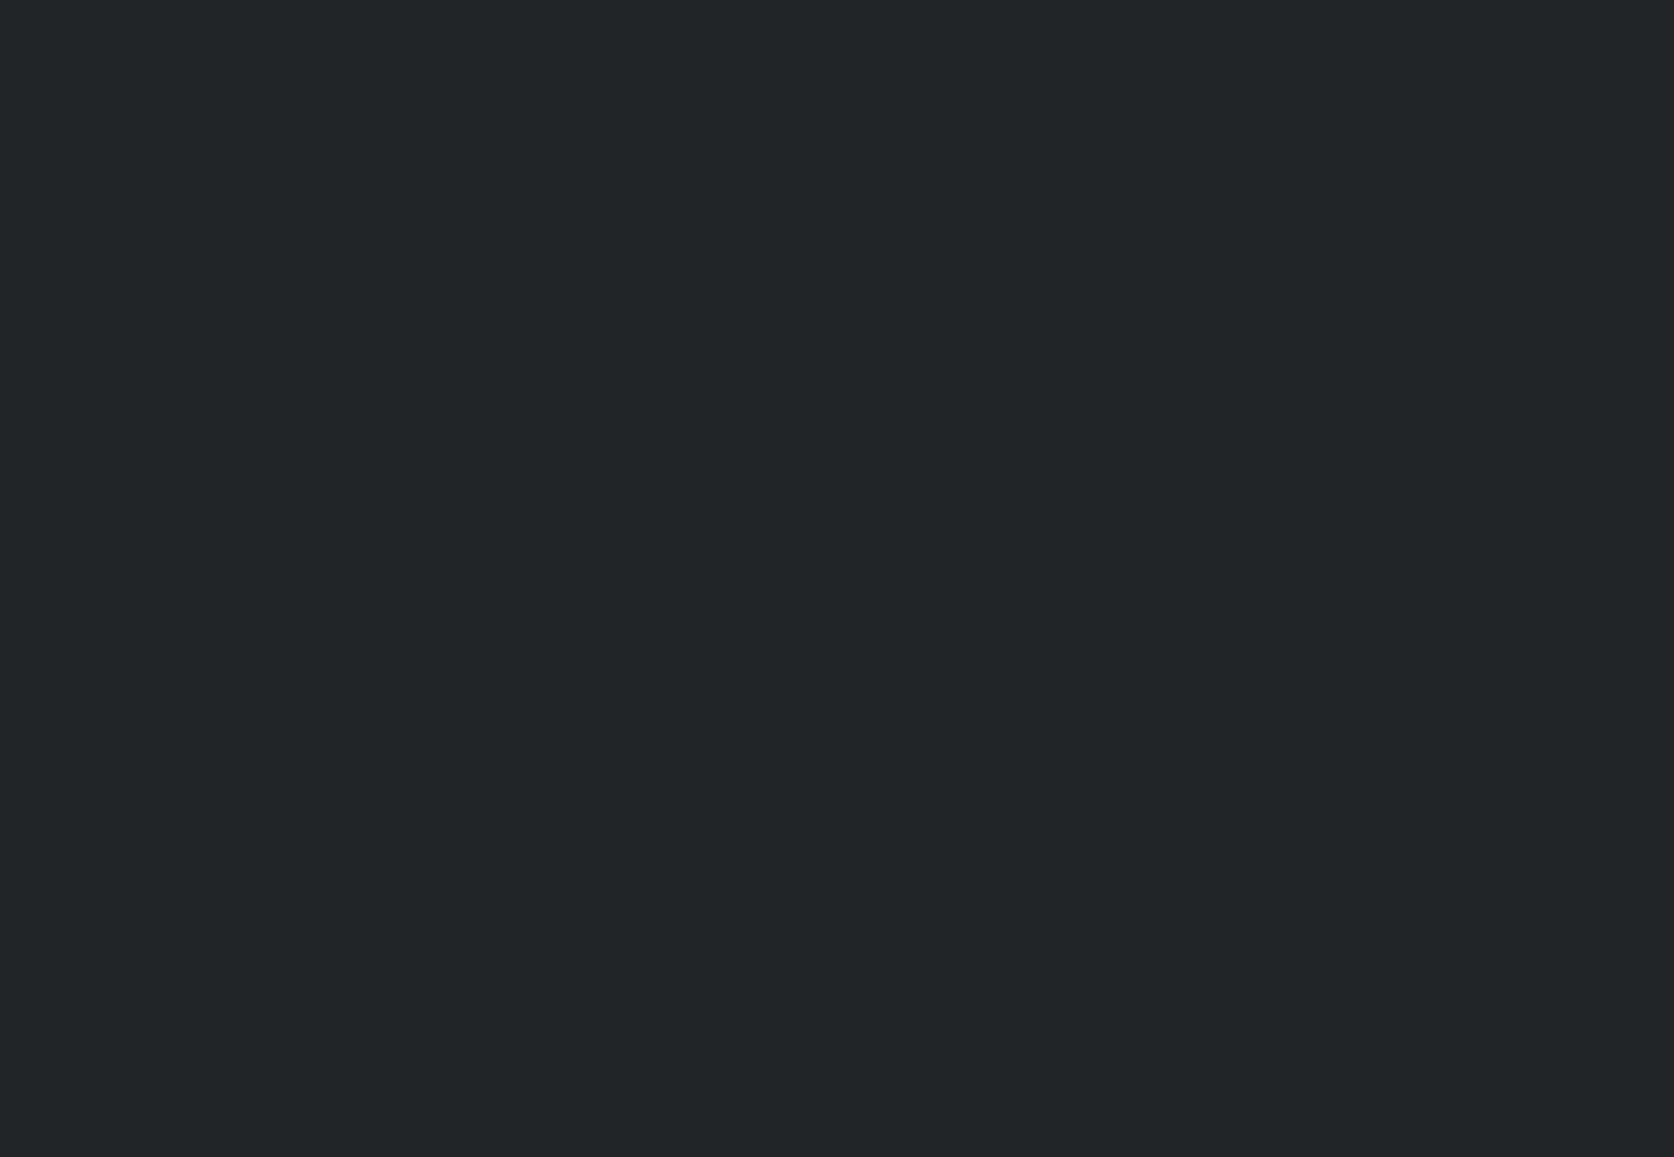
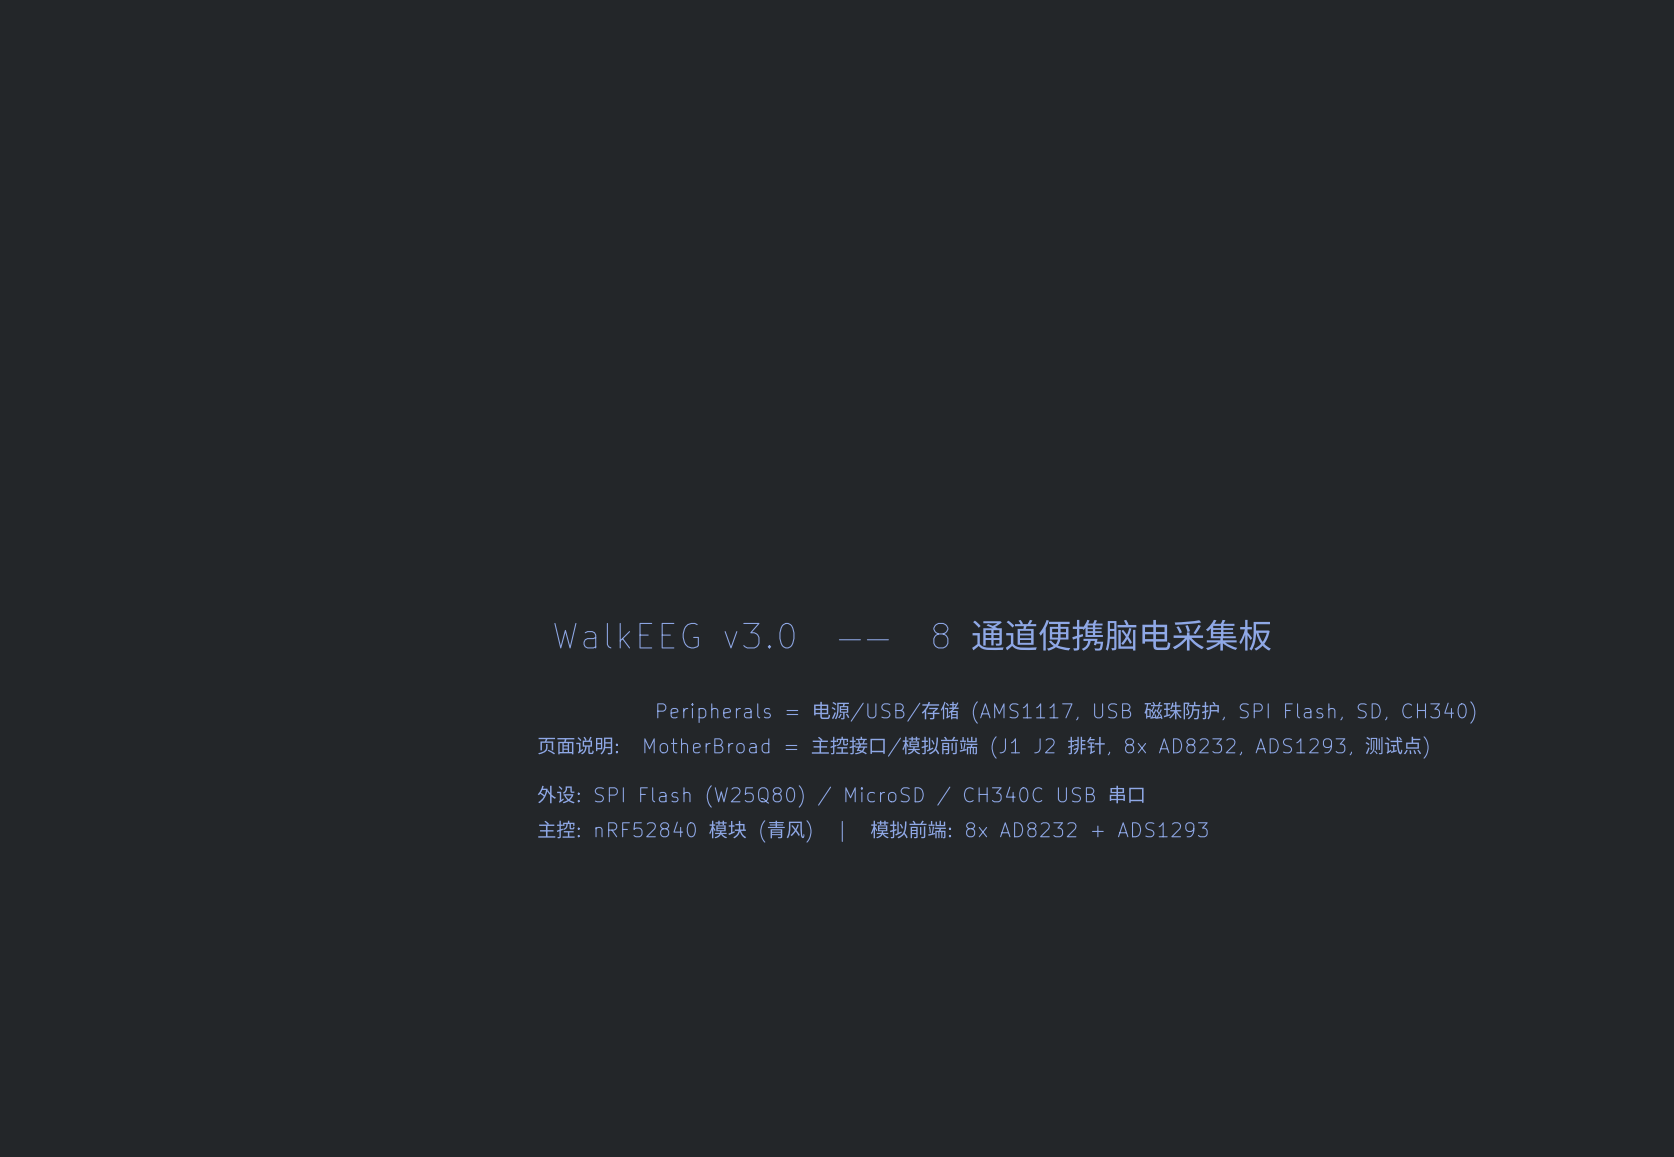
text: none -> WalkEEG v3.0 —— 8 通道便携脑电采集板 (912, 635)
text: none -> Peripherals = 电源/USB/存储 (AMS1117, USB 磁珠防护, SPI Flash, SD, CH340) (1066, 712)
text: none -> 页面说明: MotherBroad = 主控接口/模拟前端 (J1 J2 排针, 8x AD8232, ADS1293, 测试点) (983, 747)
text: none -> 外设: SPI Flash (W25Q80) / MicroSD / CH340C USB 串口 (840, 796)
text: none -> 主控: nRF52840 模块 (青风) | 模拟前端: 8x AD8232 + ADS1293 (872, 831)

